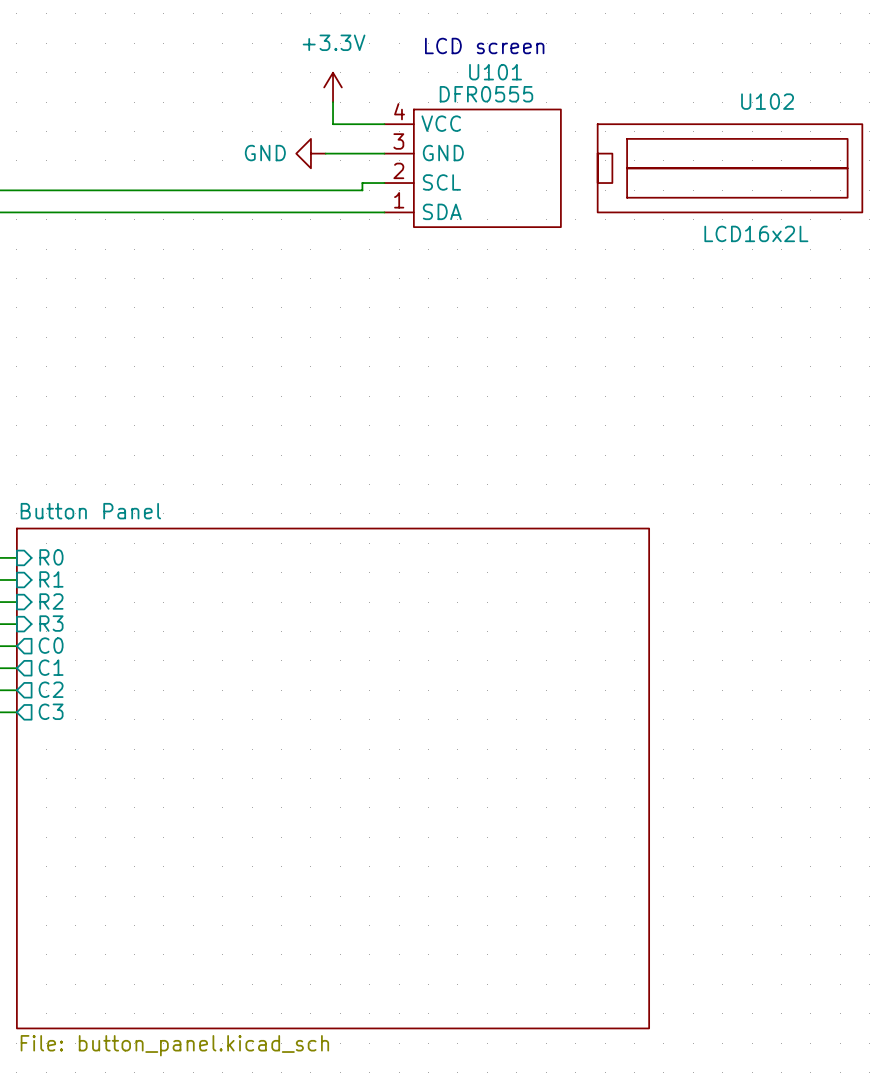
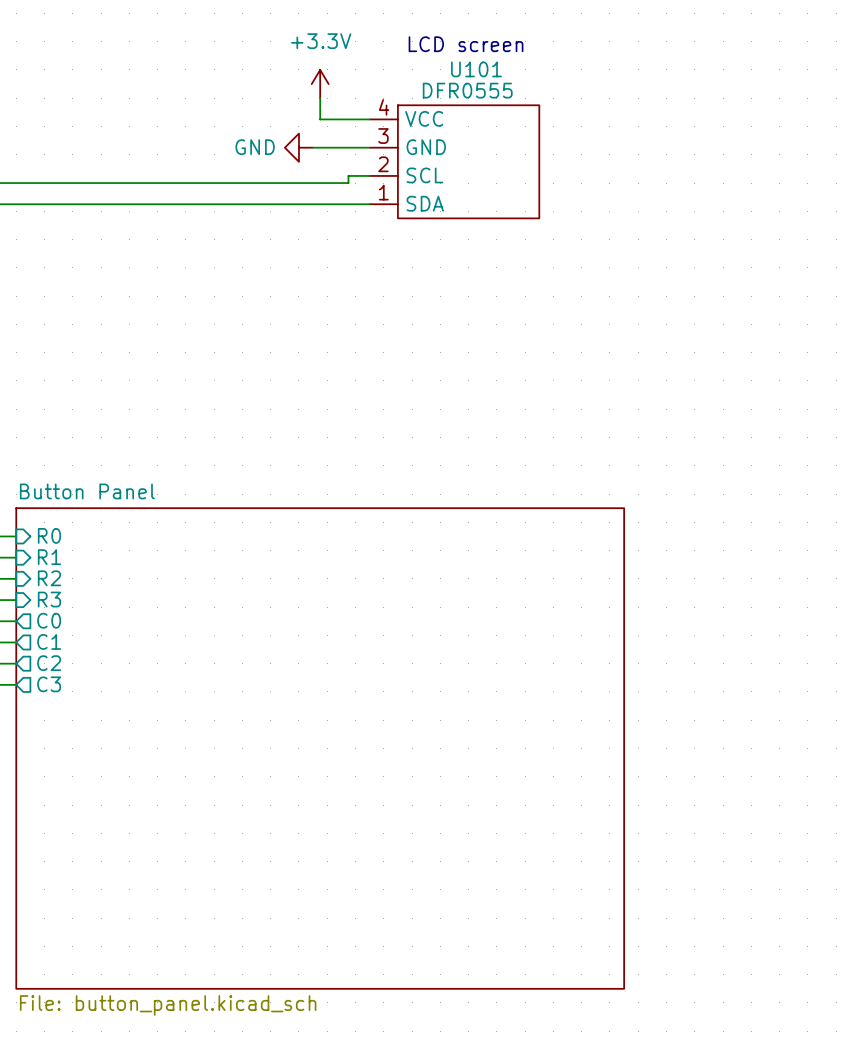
U102: LCD16x2L (730, 168) -> none

